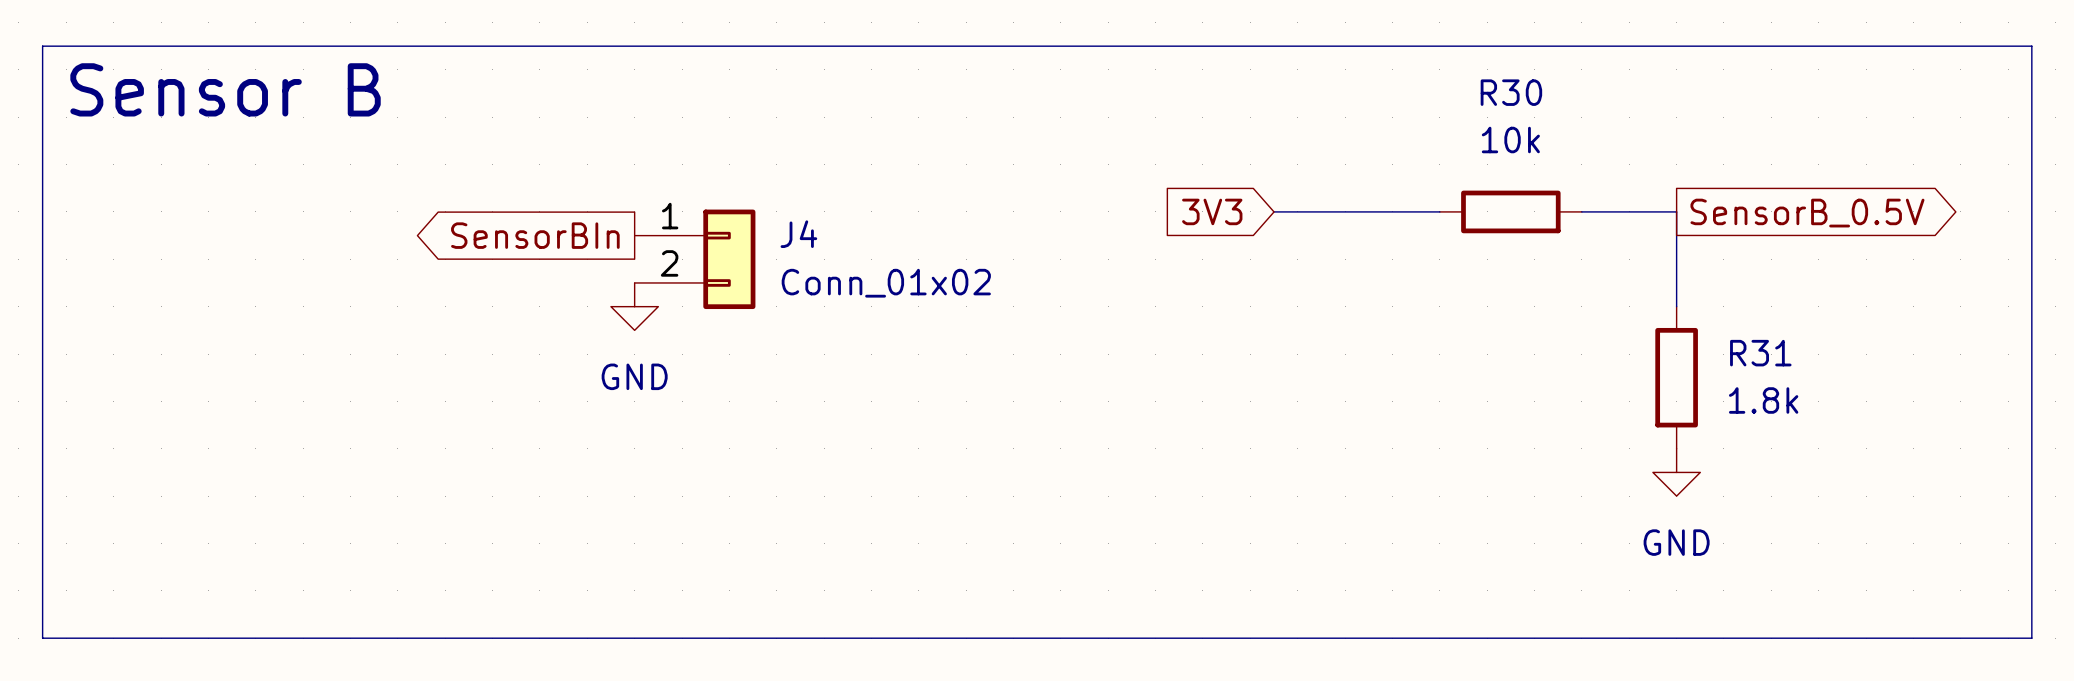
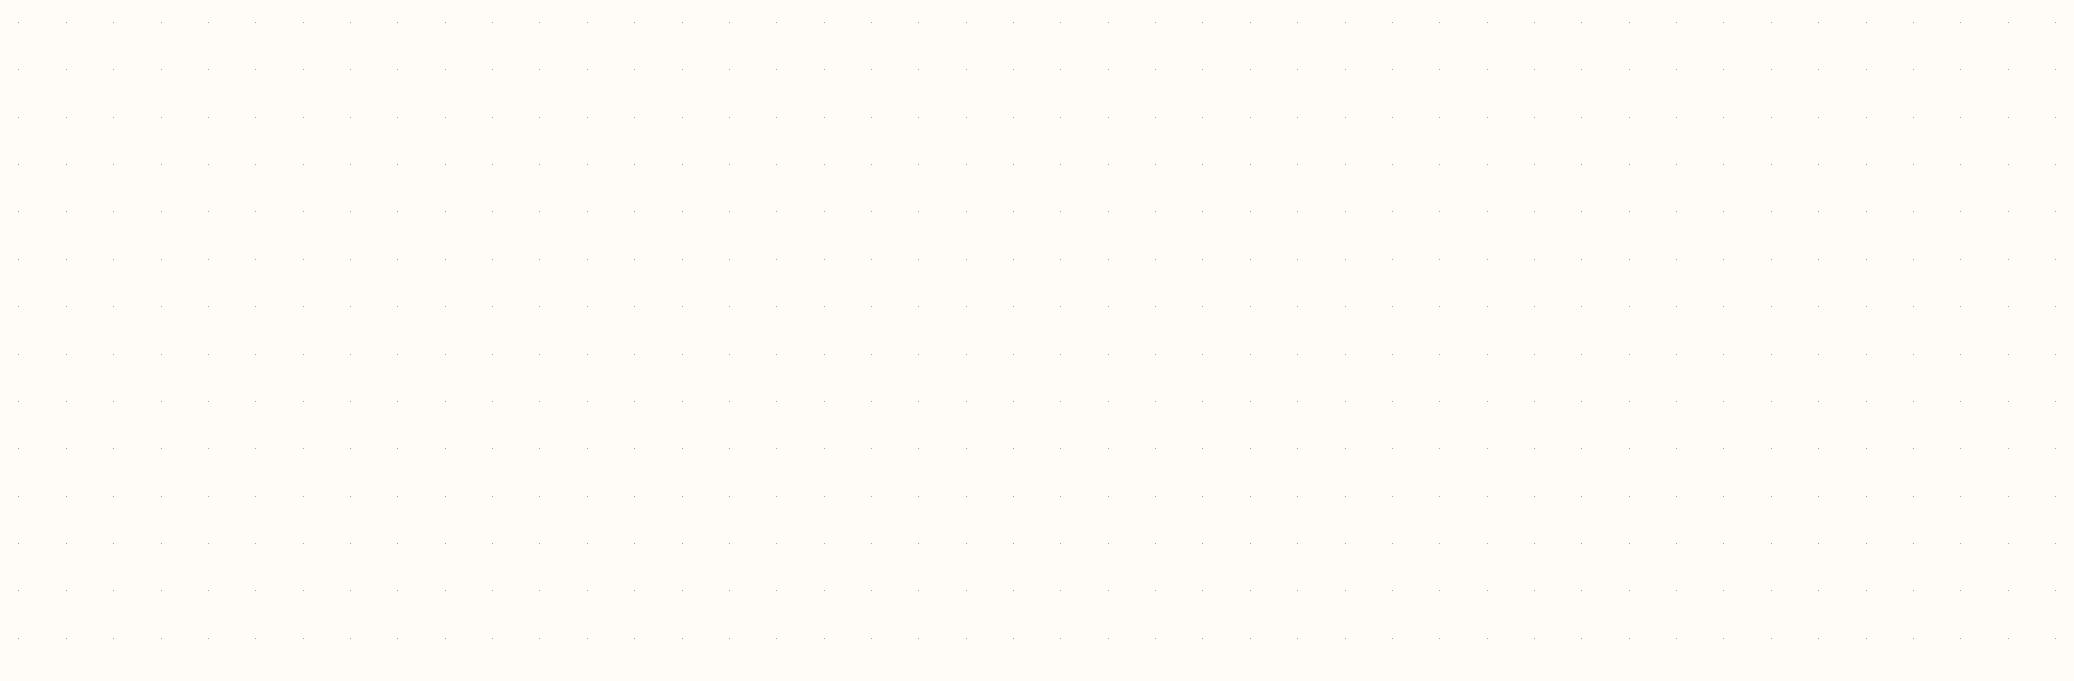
line: (42, 46) (2031, 46) (2031, 638) (42, 638) (42, 46) -> none
text: Sensor B (225, 89) -> none
global label: 3V3 (1212, 211) -> none
wire: (1274, 211) (1439, 211) -> none
R30: 10k (1510, 211) -> none
wire: (1581, 211) (1676, 211) (1676, 306) -> none
global label: SensorB_0.5V (1807, 213) -> none
global label: SensorBIn (535, 235) -> none
J4: Conn_01x02 (695, 259) -> none
power symbol: GND (634, 306) -> none
R31: 1.8k (1676, 377) -> none
power symbol: GND (1676, 472) -> none

